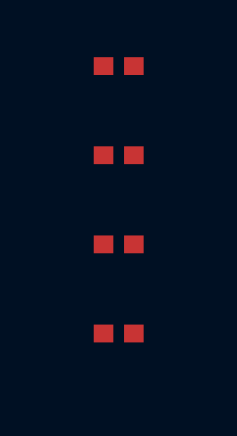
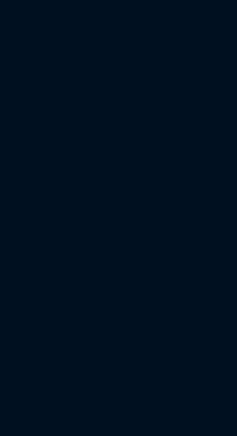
part: (118, 66) -> none
part: (118, 155) -> none
part: (118, 244) -> none
part: (118, 333) -> none

